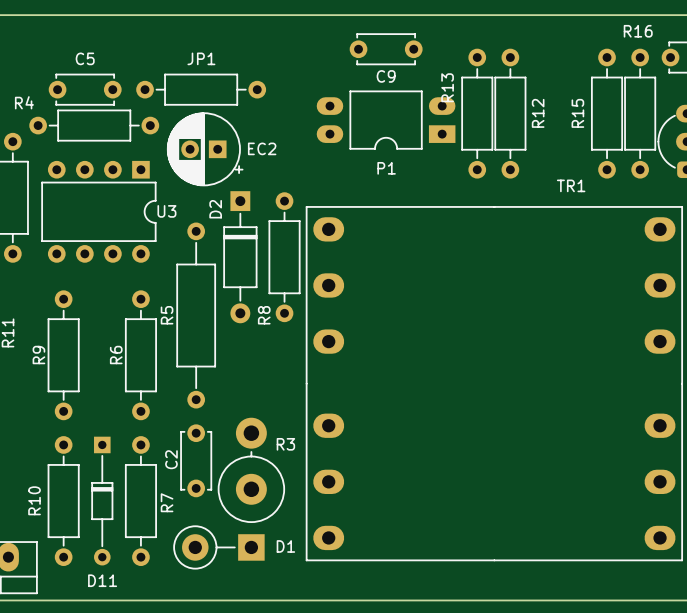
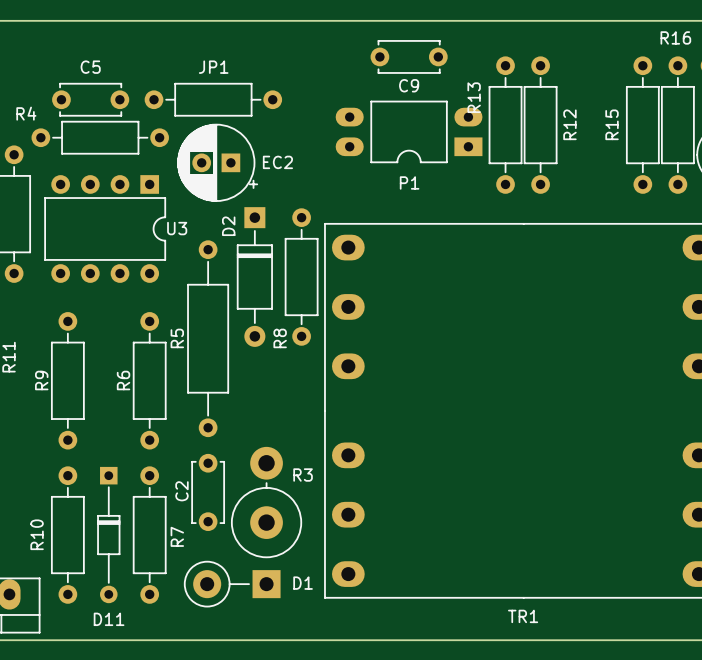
TR1 name position: TR1 (571, 185) -> TR1 (523, 616)

